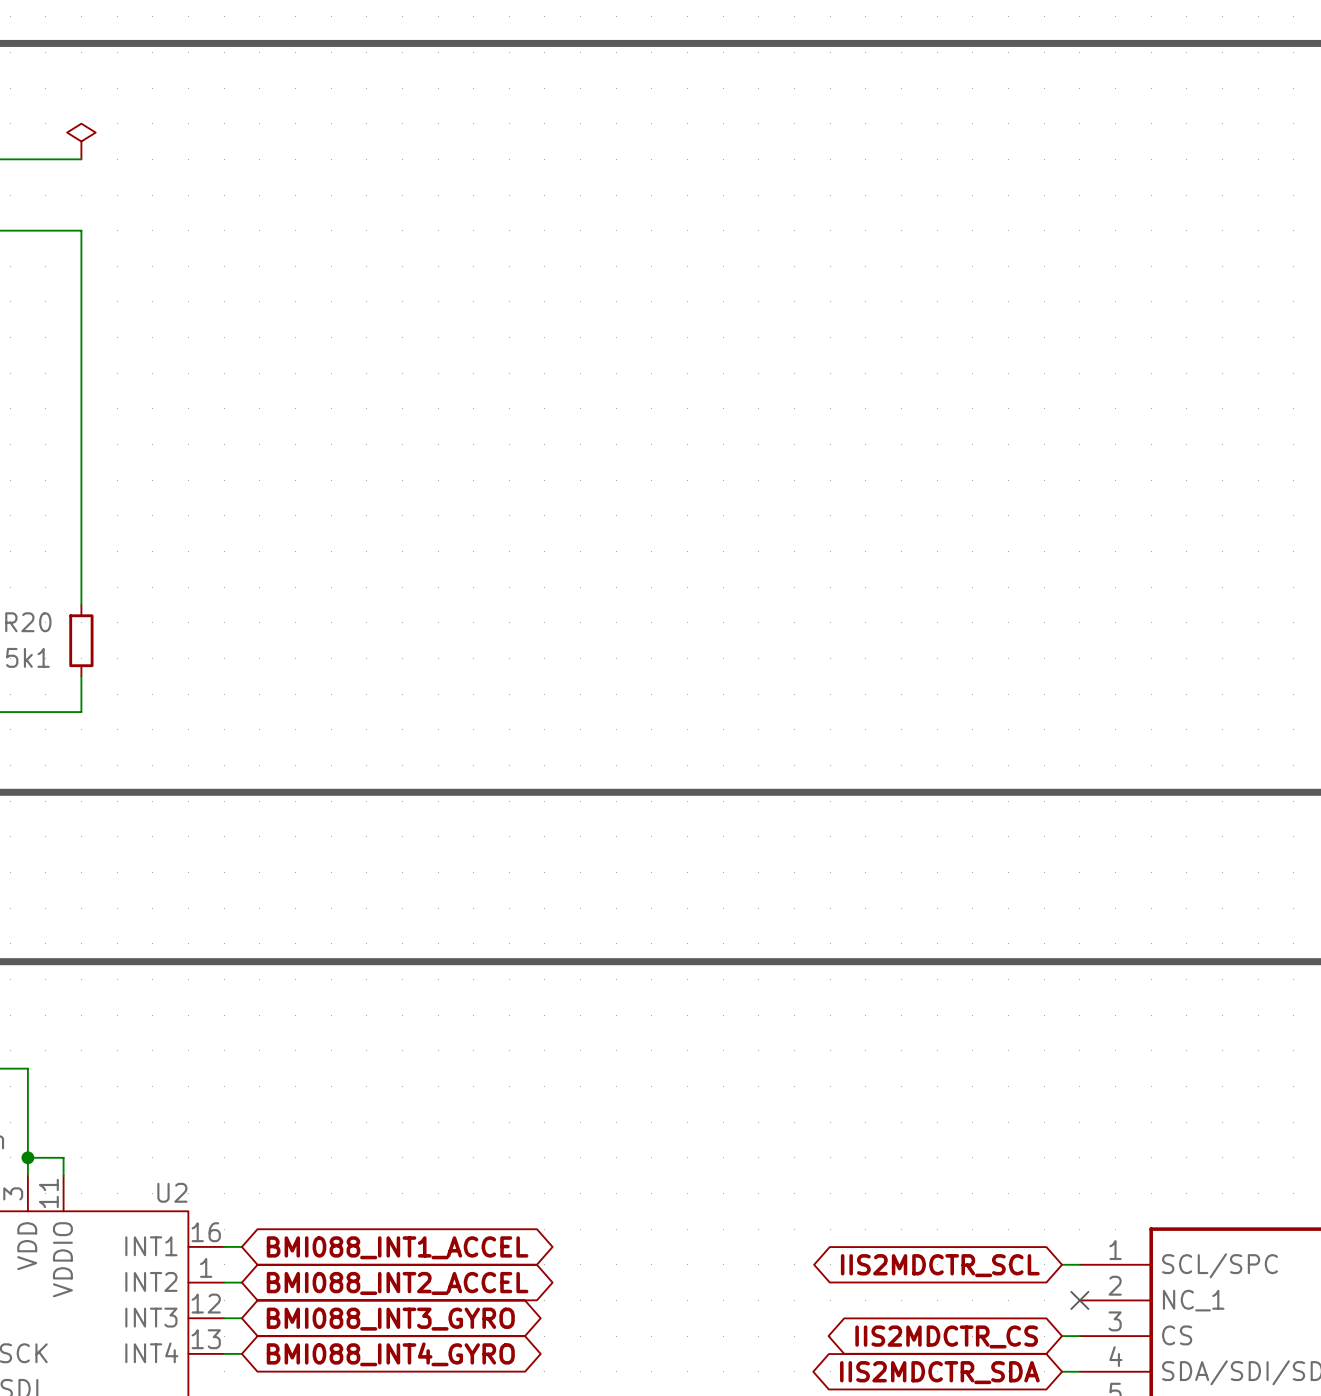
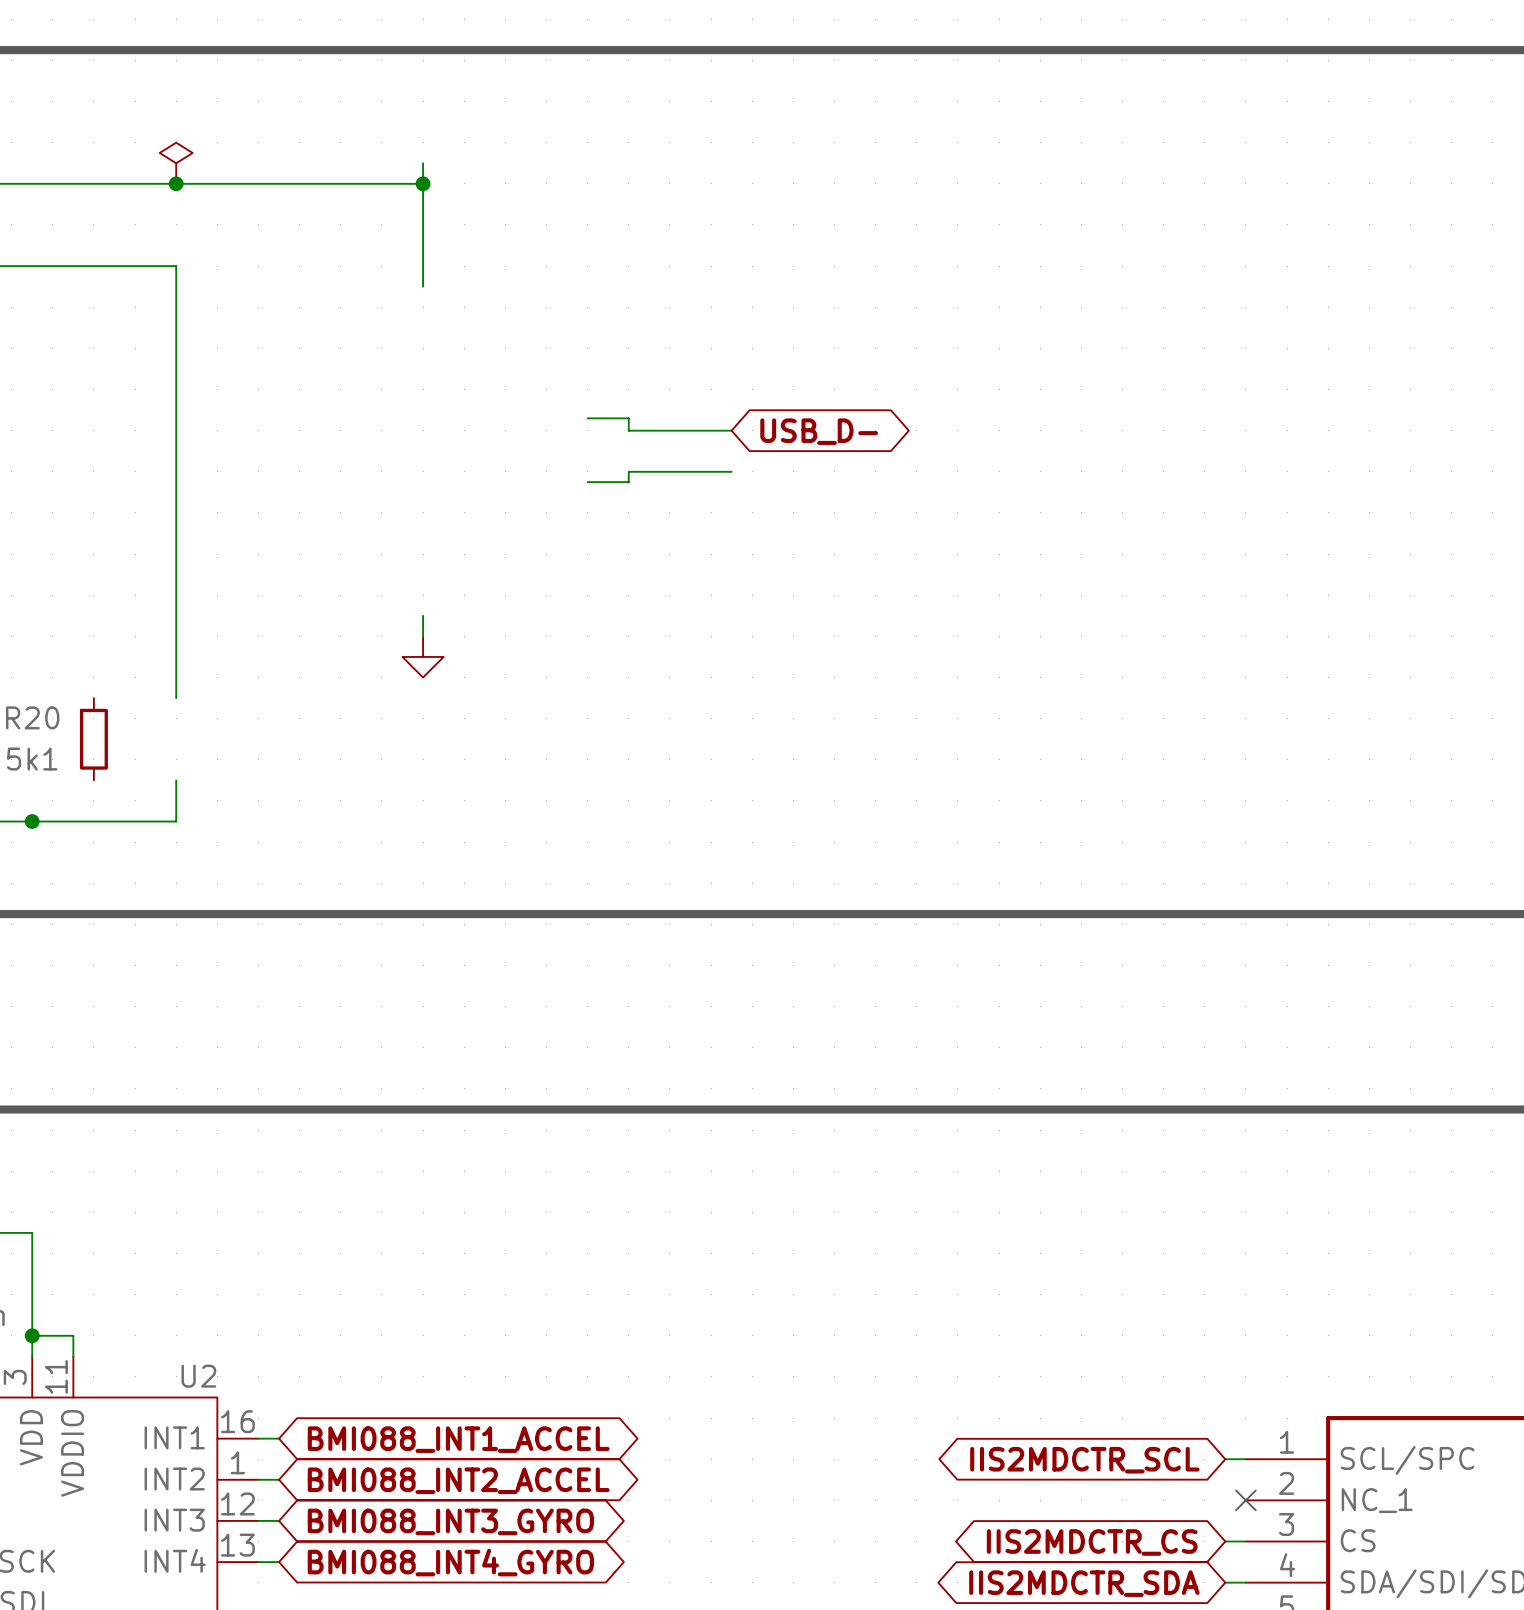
power symbol position: (81, 141) -> (176, 163)
wire: none -> (423, 163) (423, 286)
wire: none -> (93, 183) (423, 183)
junction: none -> (176, 183)
junction: none -> (423, 183)
wire: (81, 230) (81, 605) -> (93, 266) (176, 266) (176, 698)
wire: none -> (587, 418) (628, 418) (628, 430) (731, 430)
global label: none -> USB_D- (819, 431)
wire: none -> (731, 471) (628, 471) (628, 482) (587, 482)
wire: none -> (423, 615) (423, 636)
power symbol: none -> (423, 656)
wire: (81, 676) (81, 712) -> (176, 780) (176, 821) (93, 821)
junction: none -> (32, 821)

